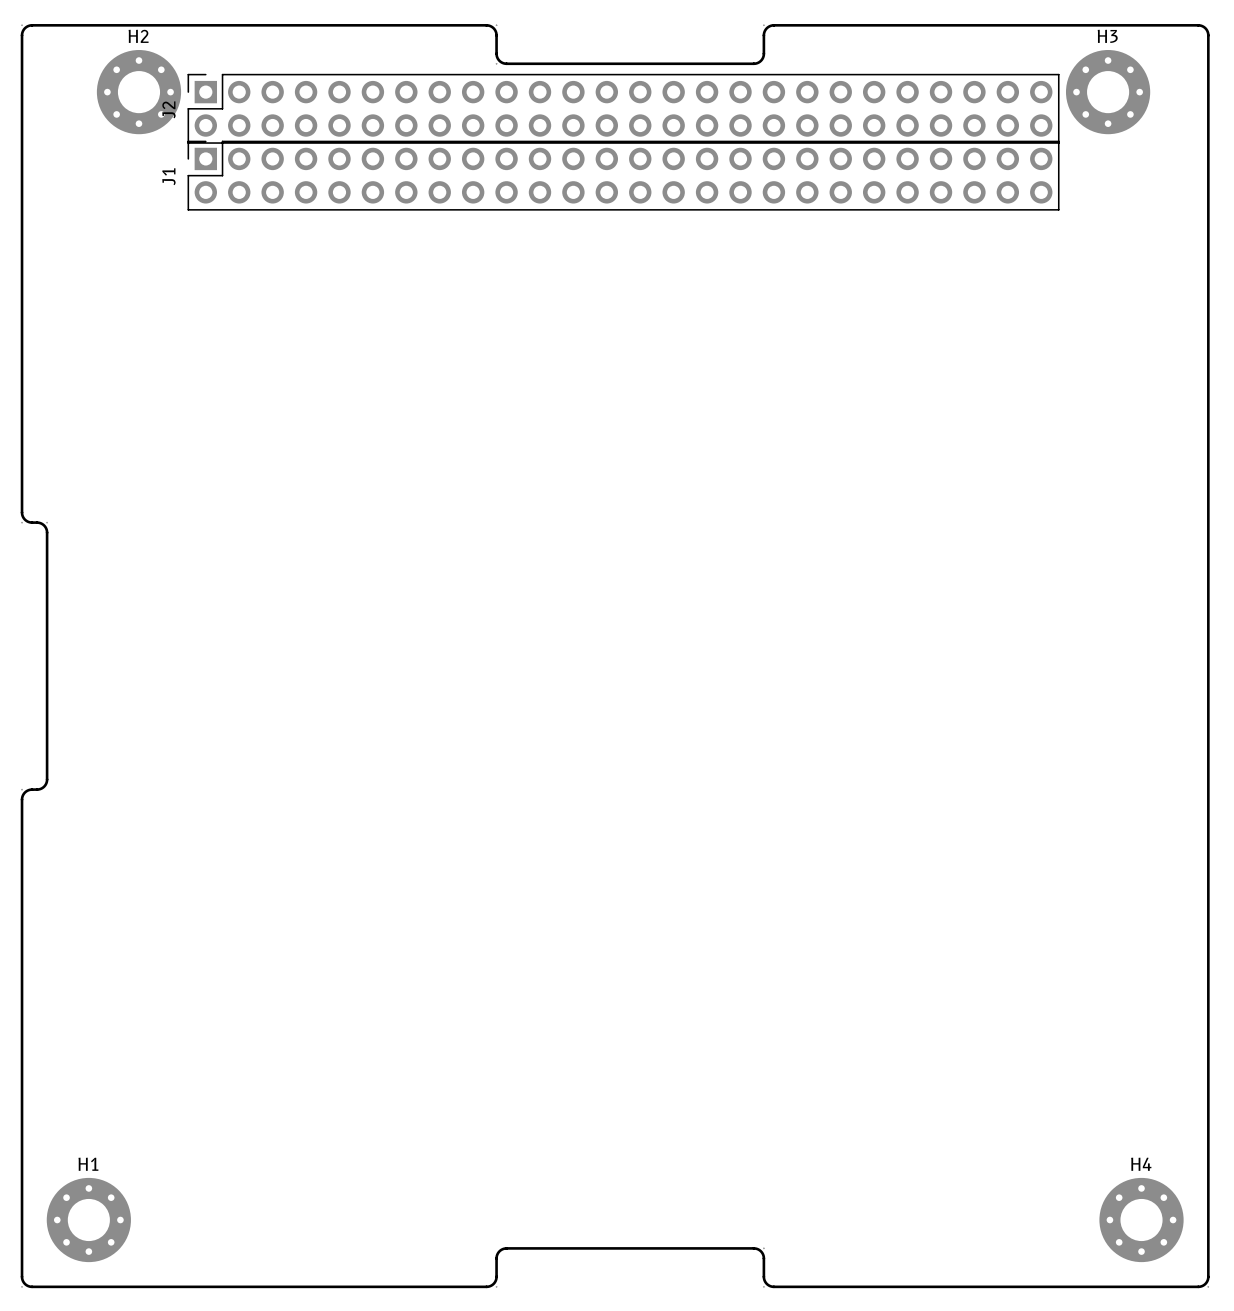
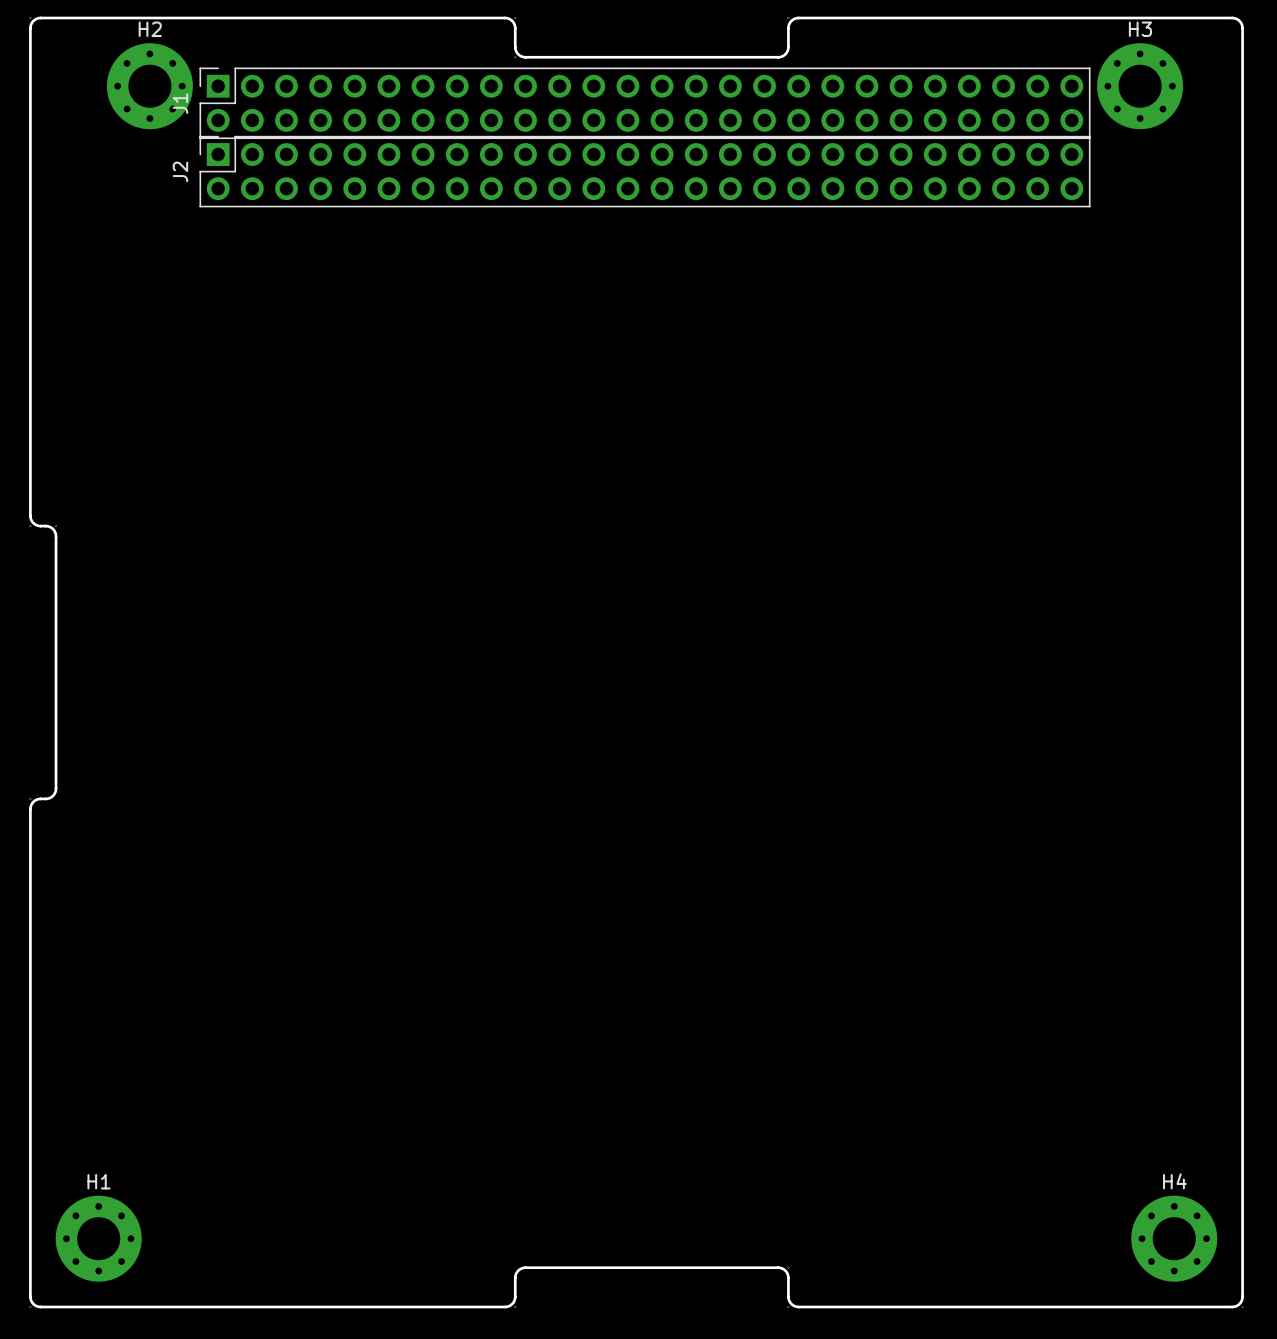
J2 name: J2 (168, 109) -> J1 (180, 103)
J1 name: J1 (168, 176) -> J2 (180, 171)

